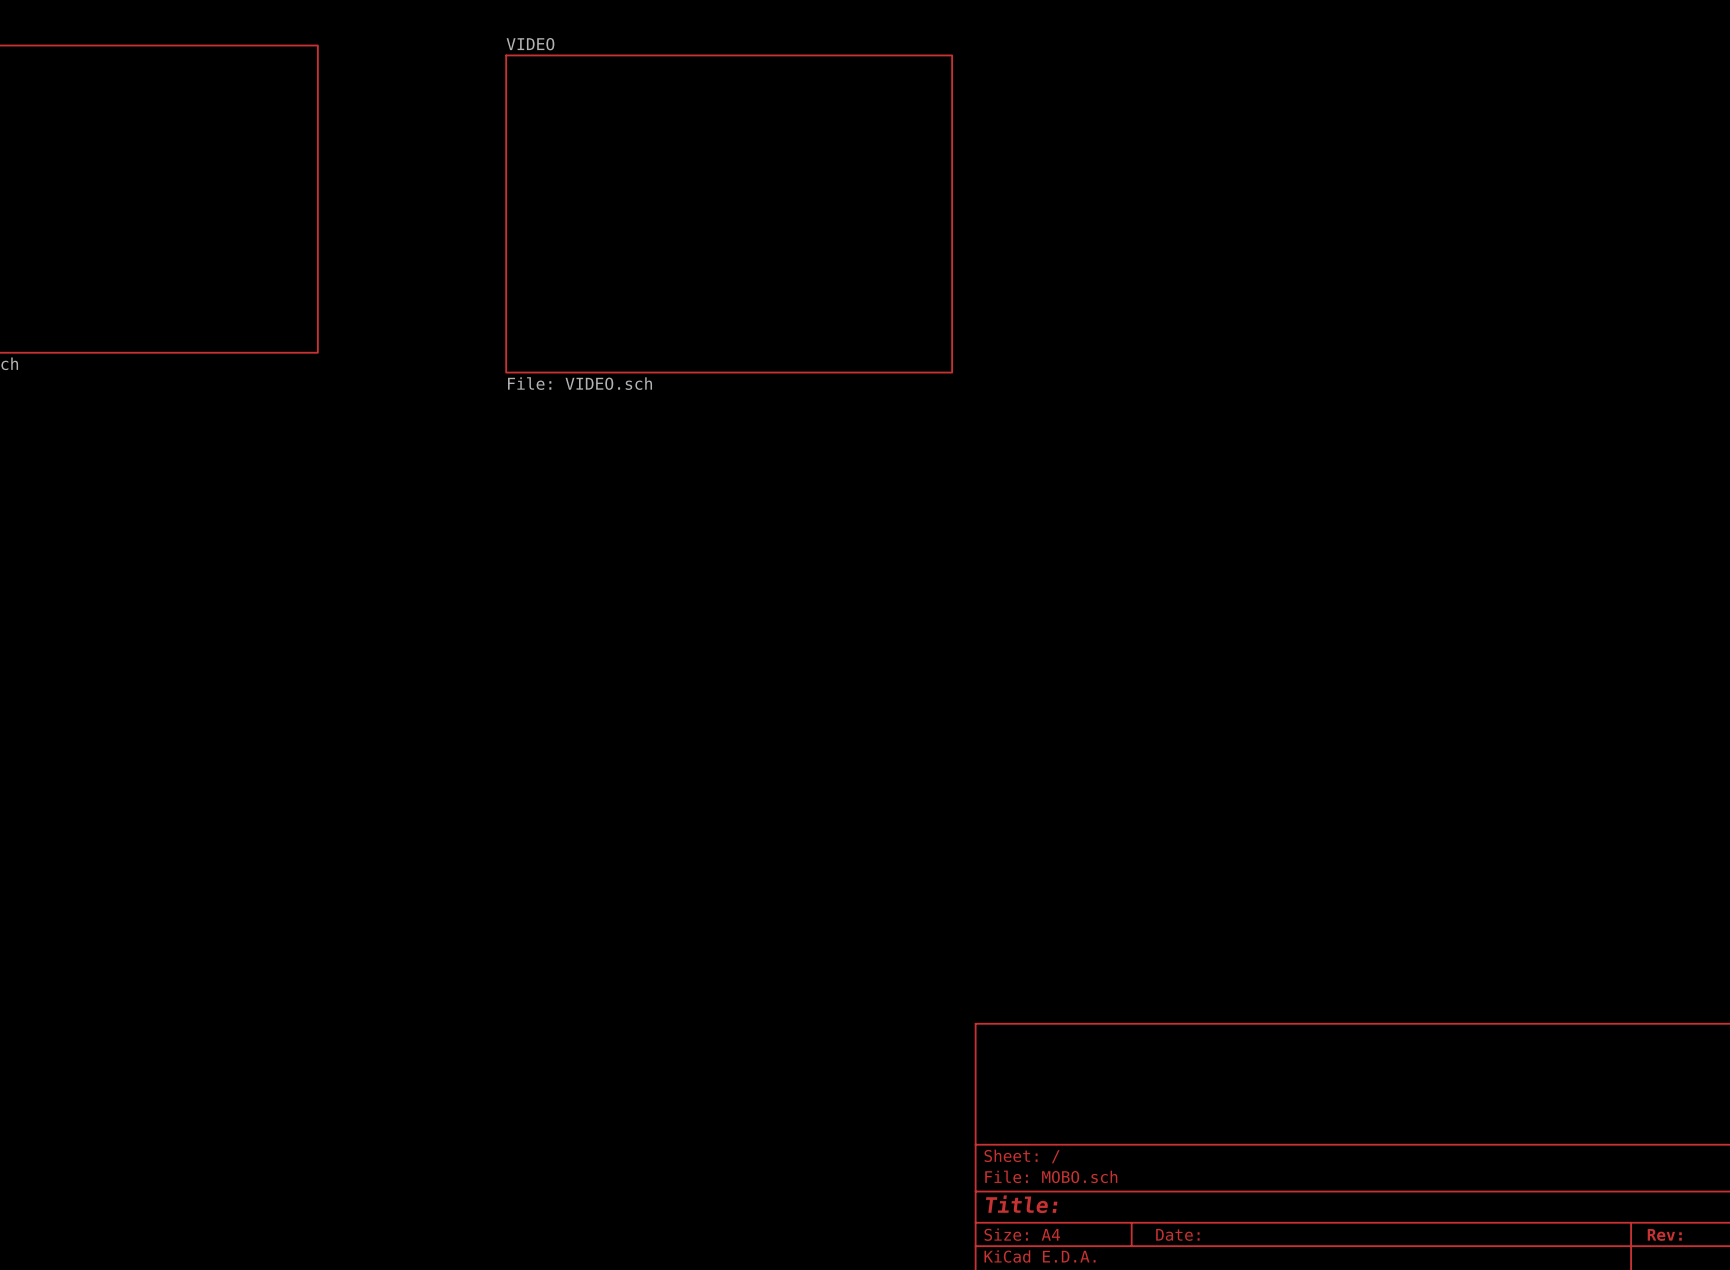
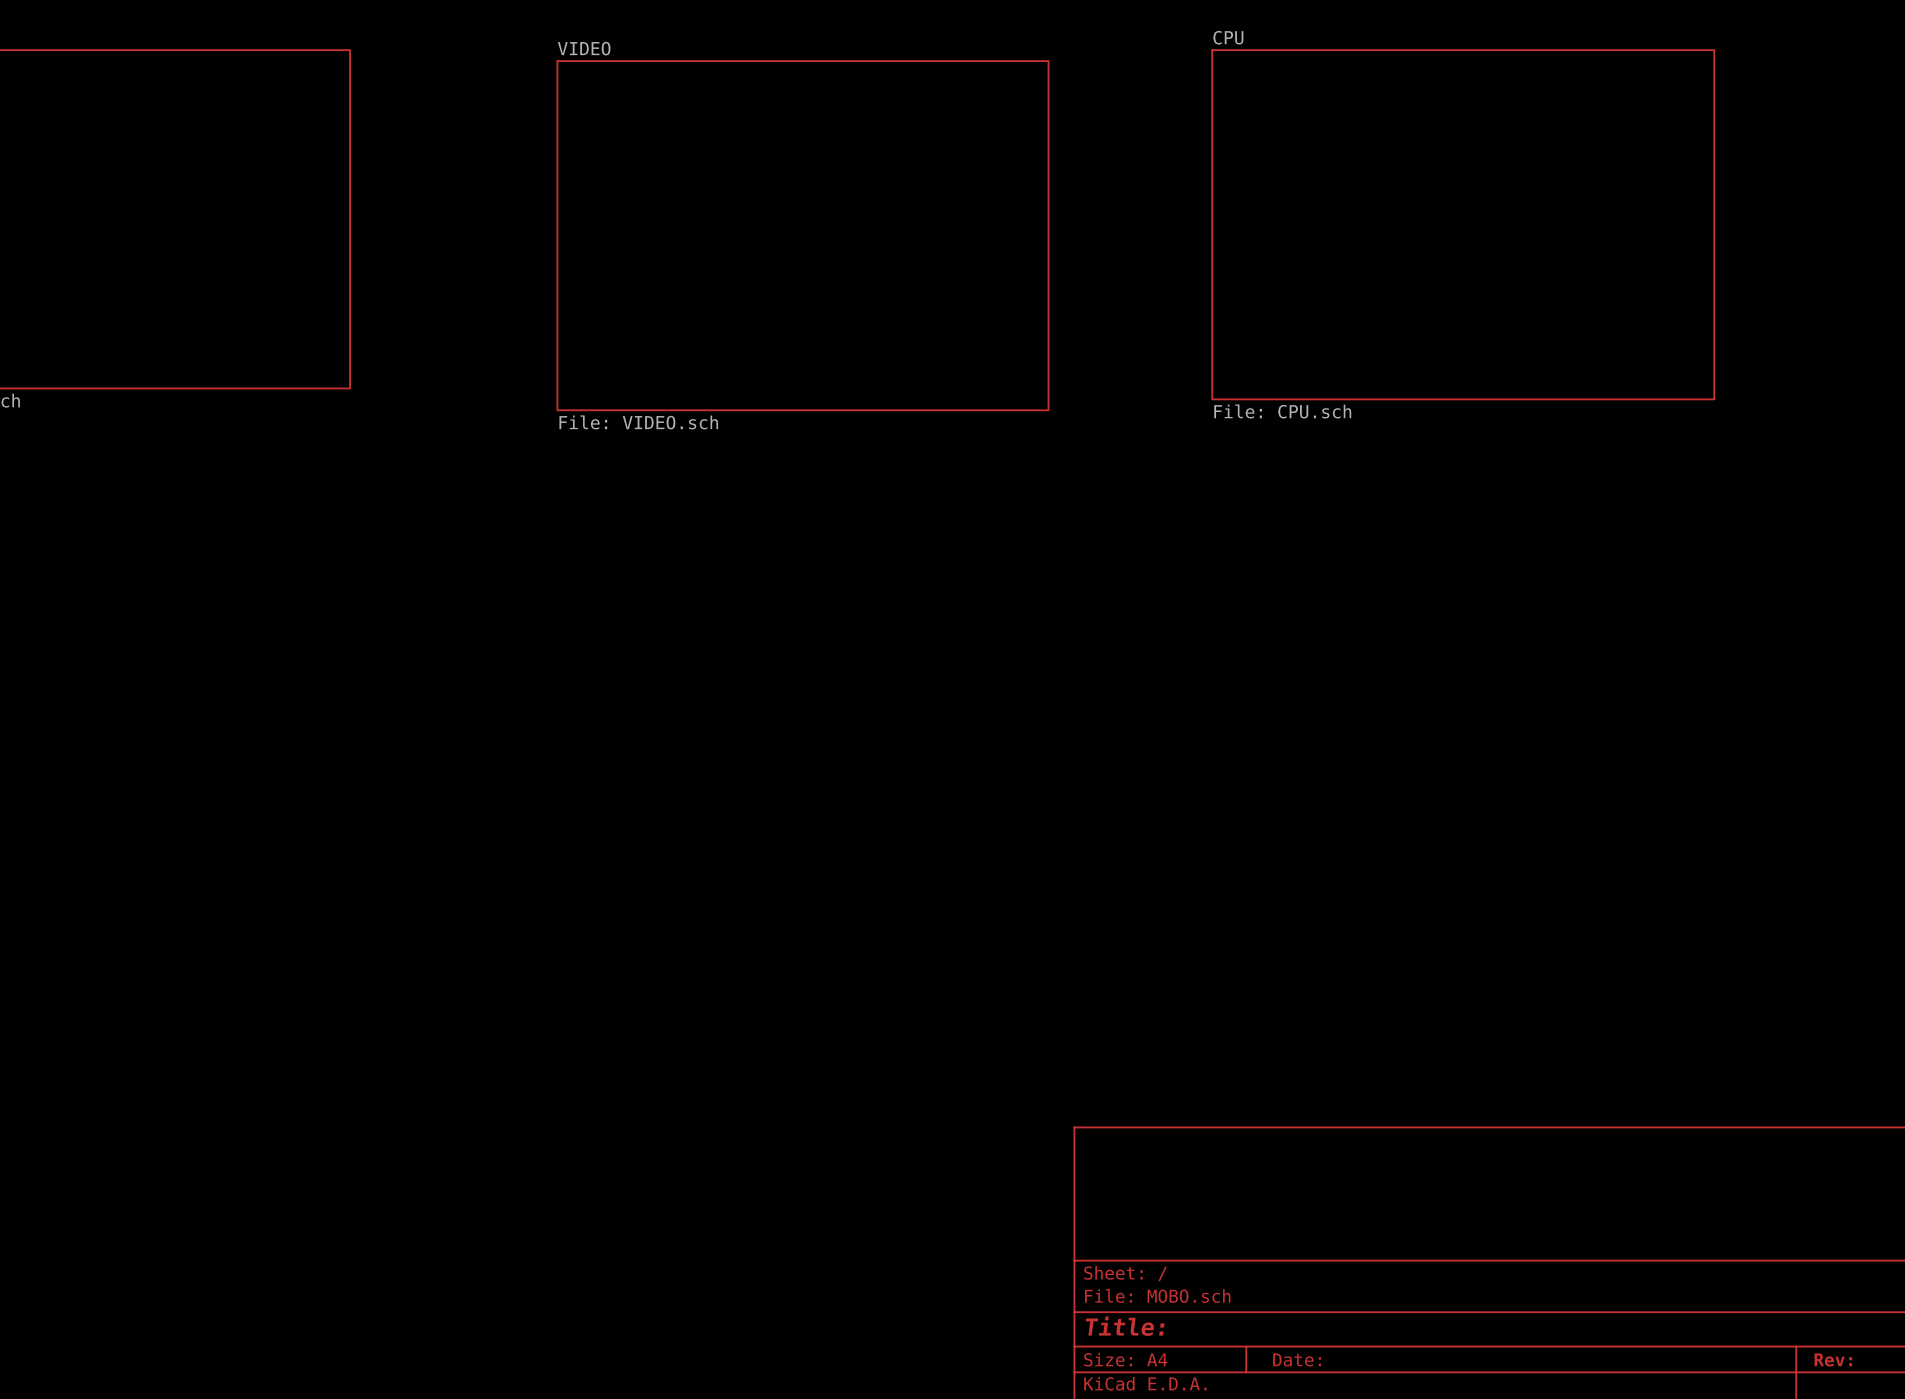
sheet CPU: none -> File: CPU.sch (1463, 224)

